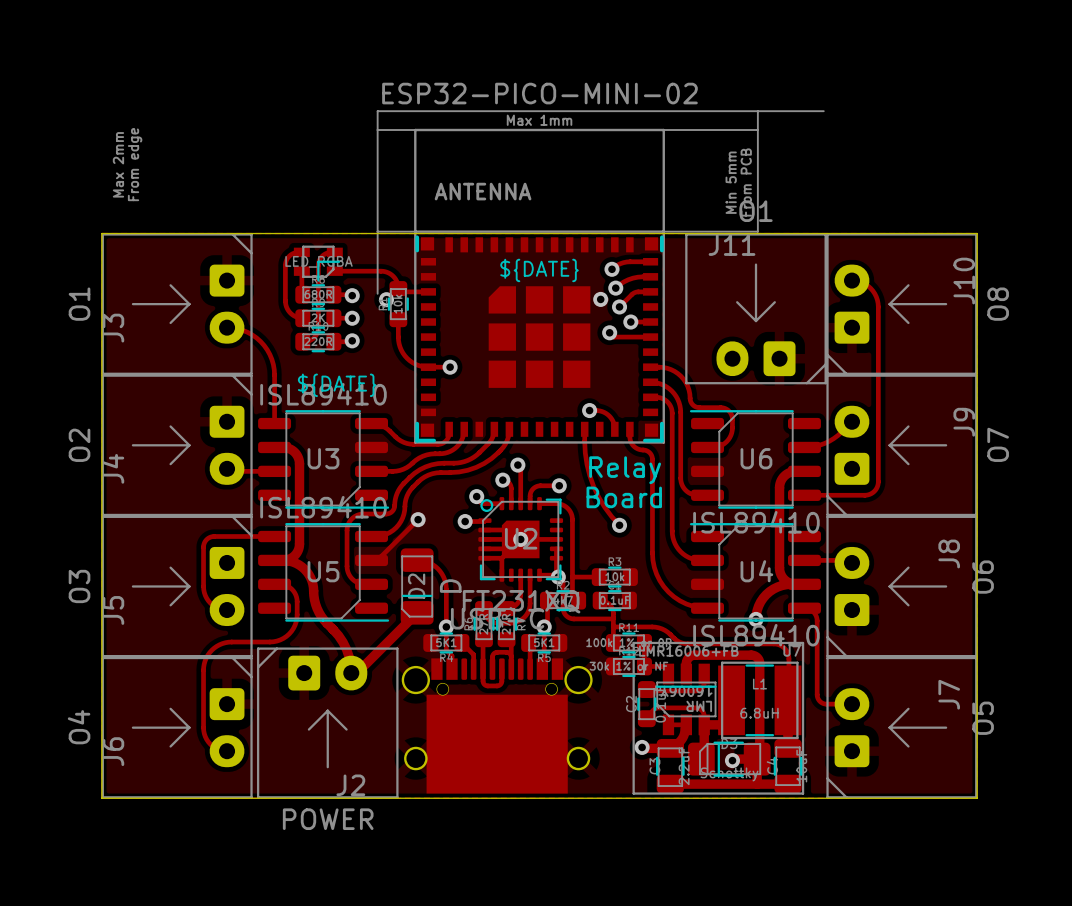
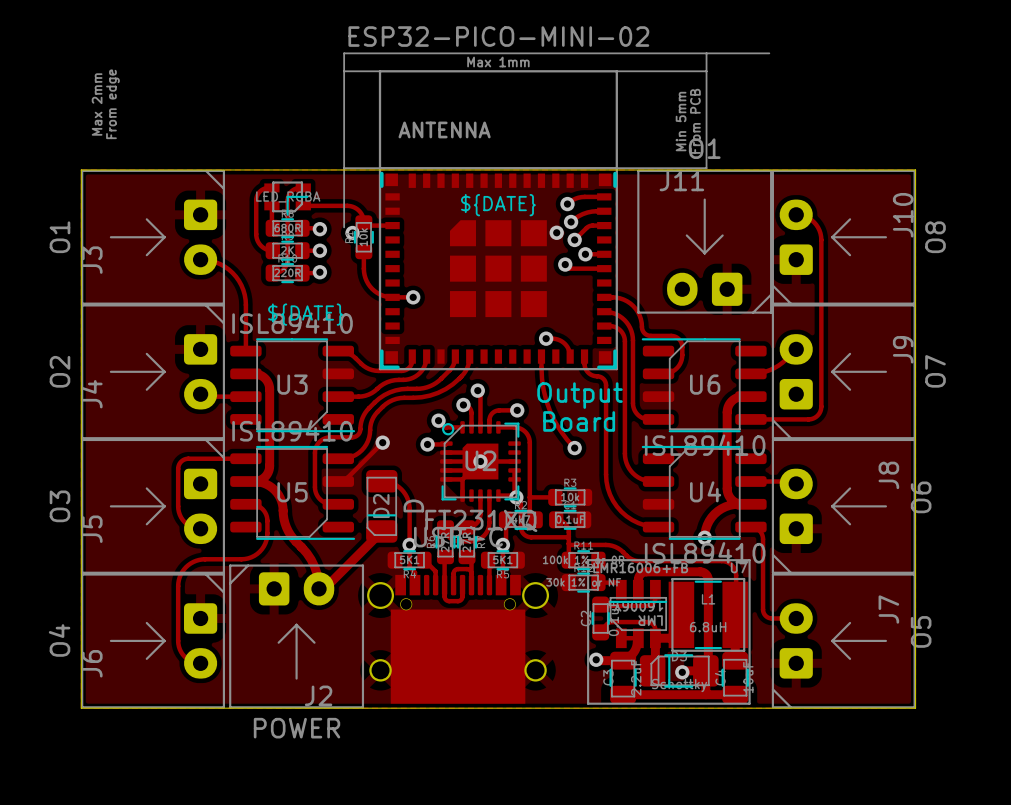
text: Relay (625, 470) -> Output (580, 395)

